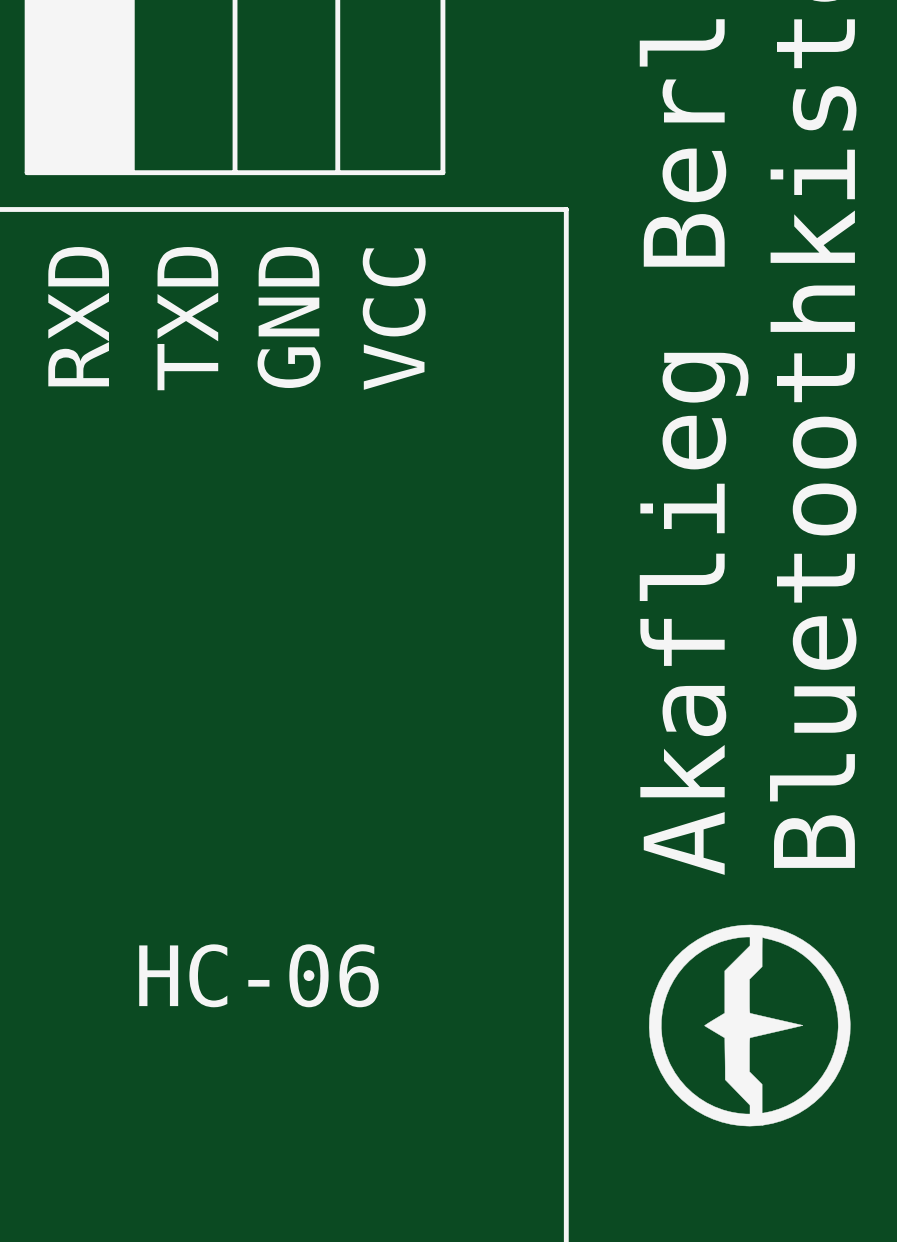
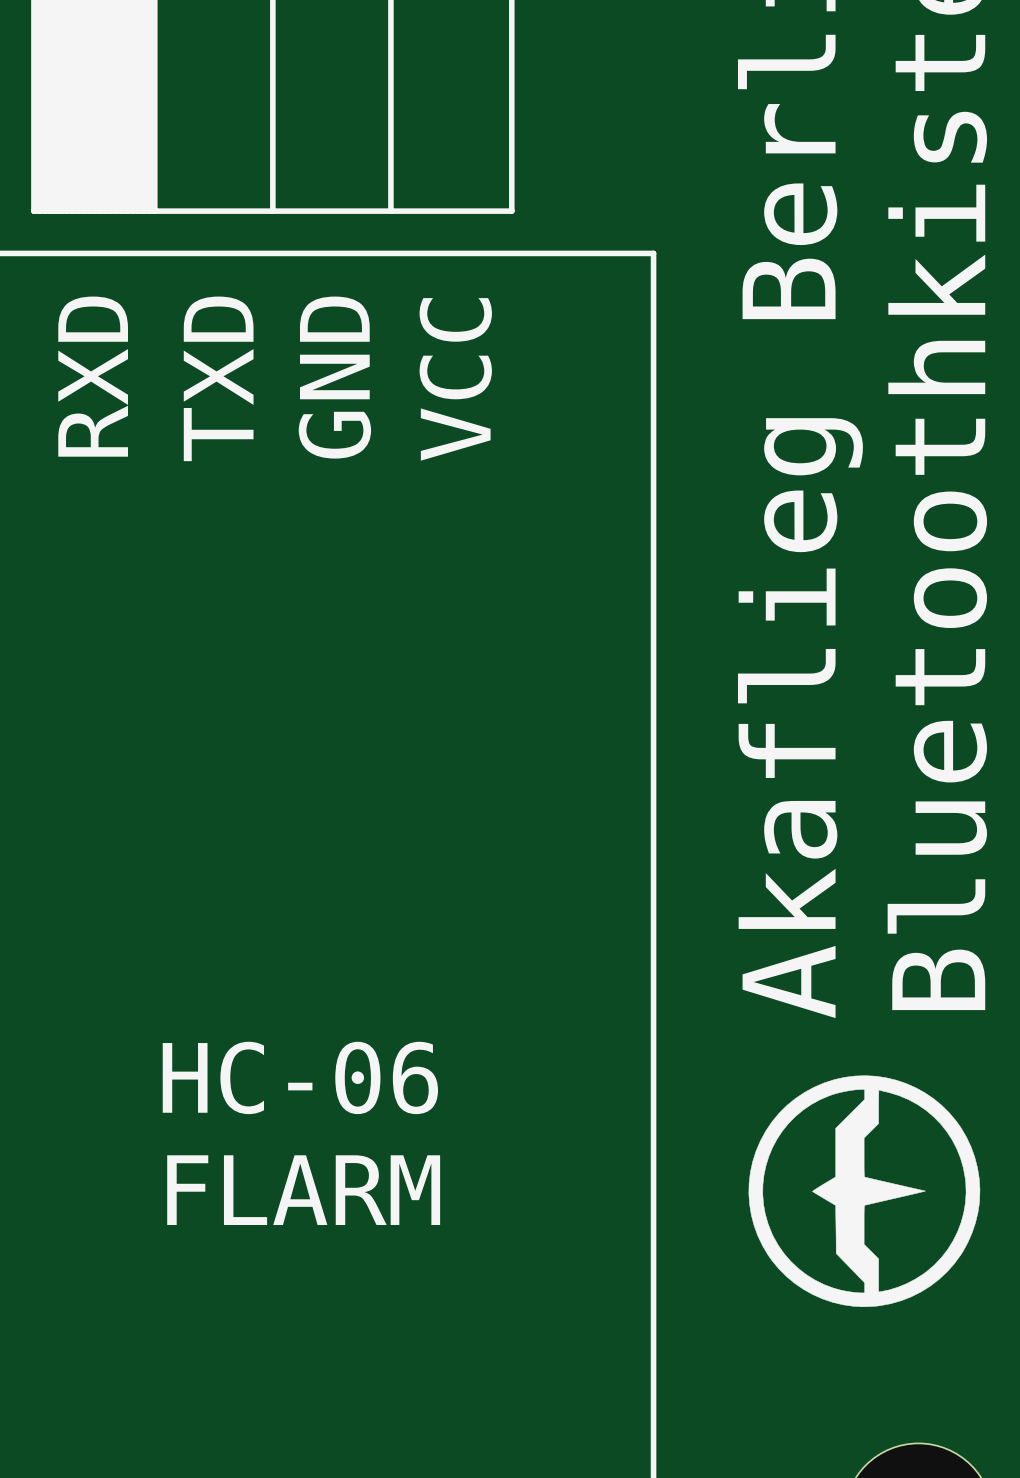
text position: HC-06 (258, 975) -> HC-06 (300, 1077)
text: none -> FLARM (303, 1190)

